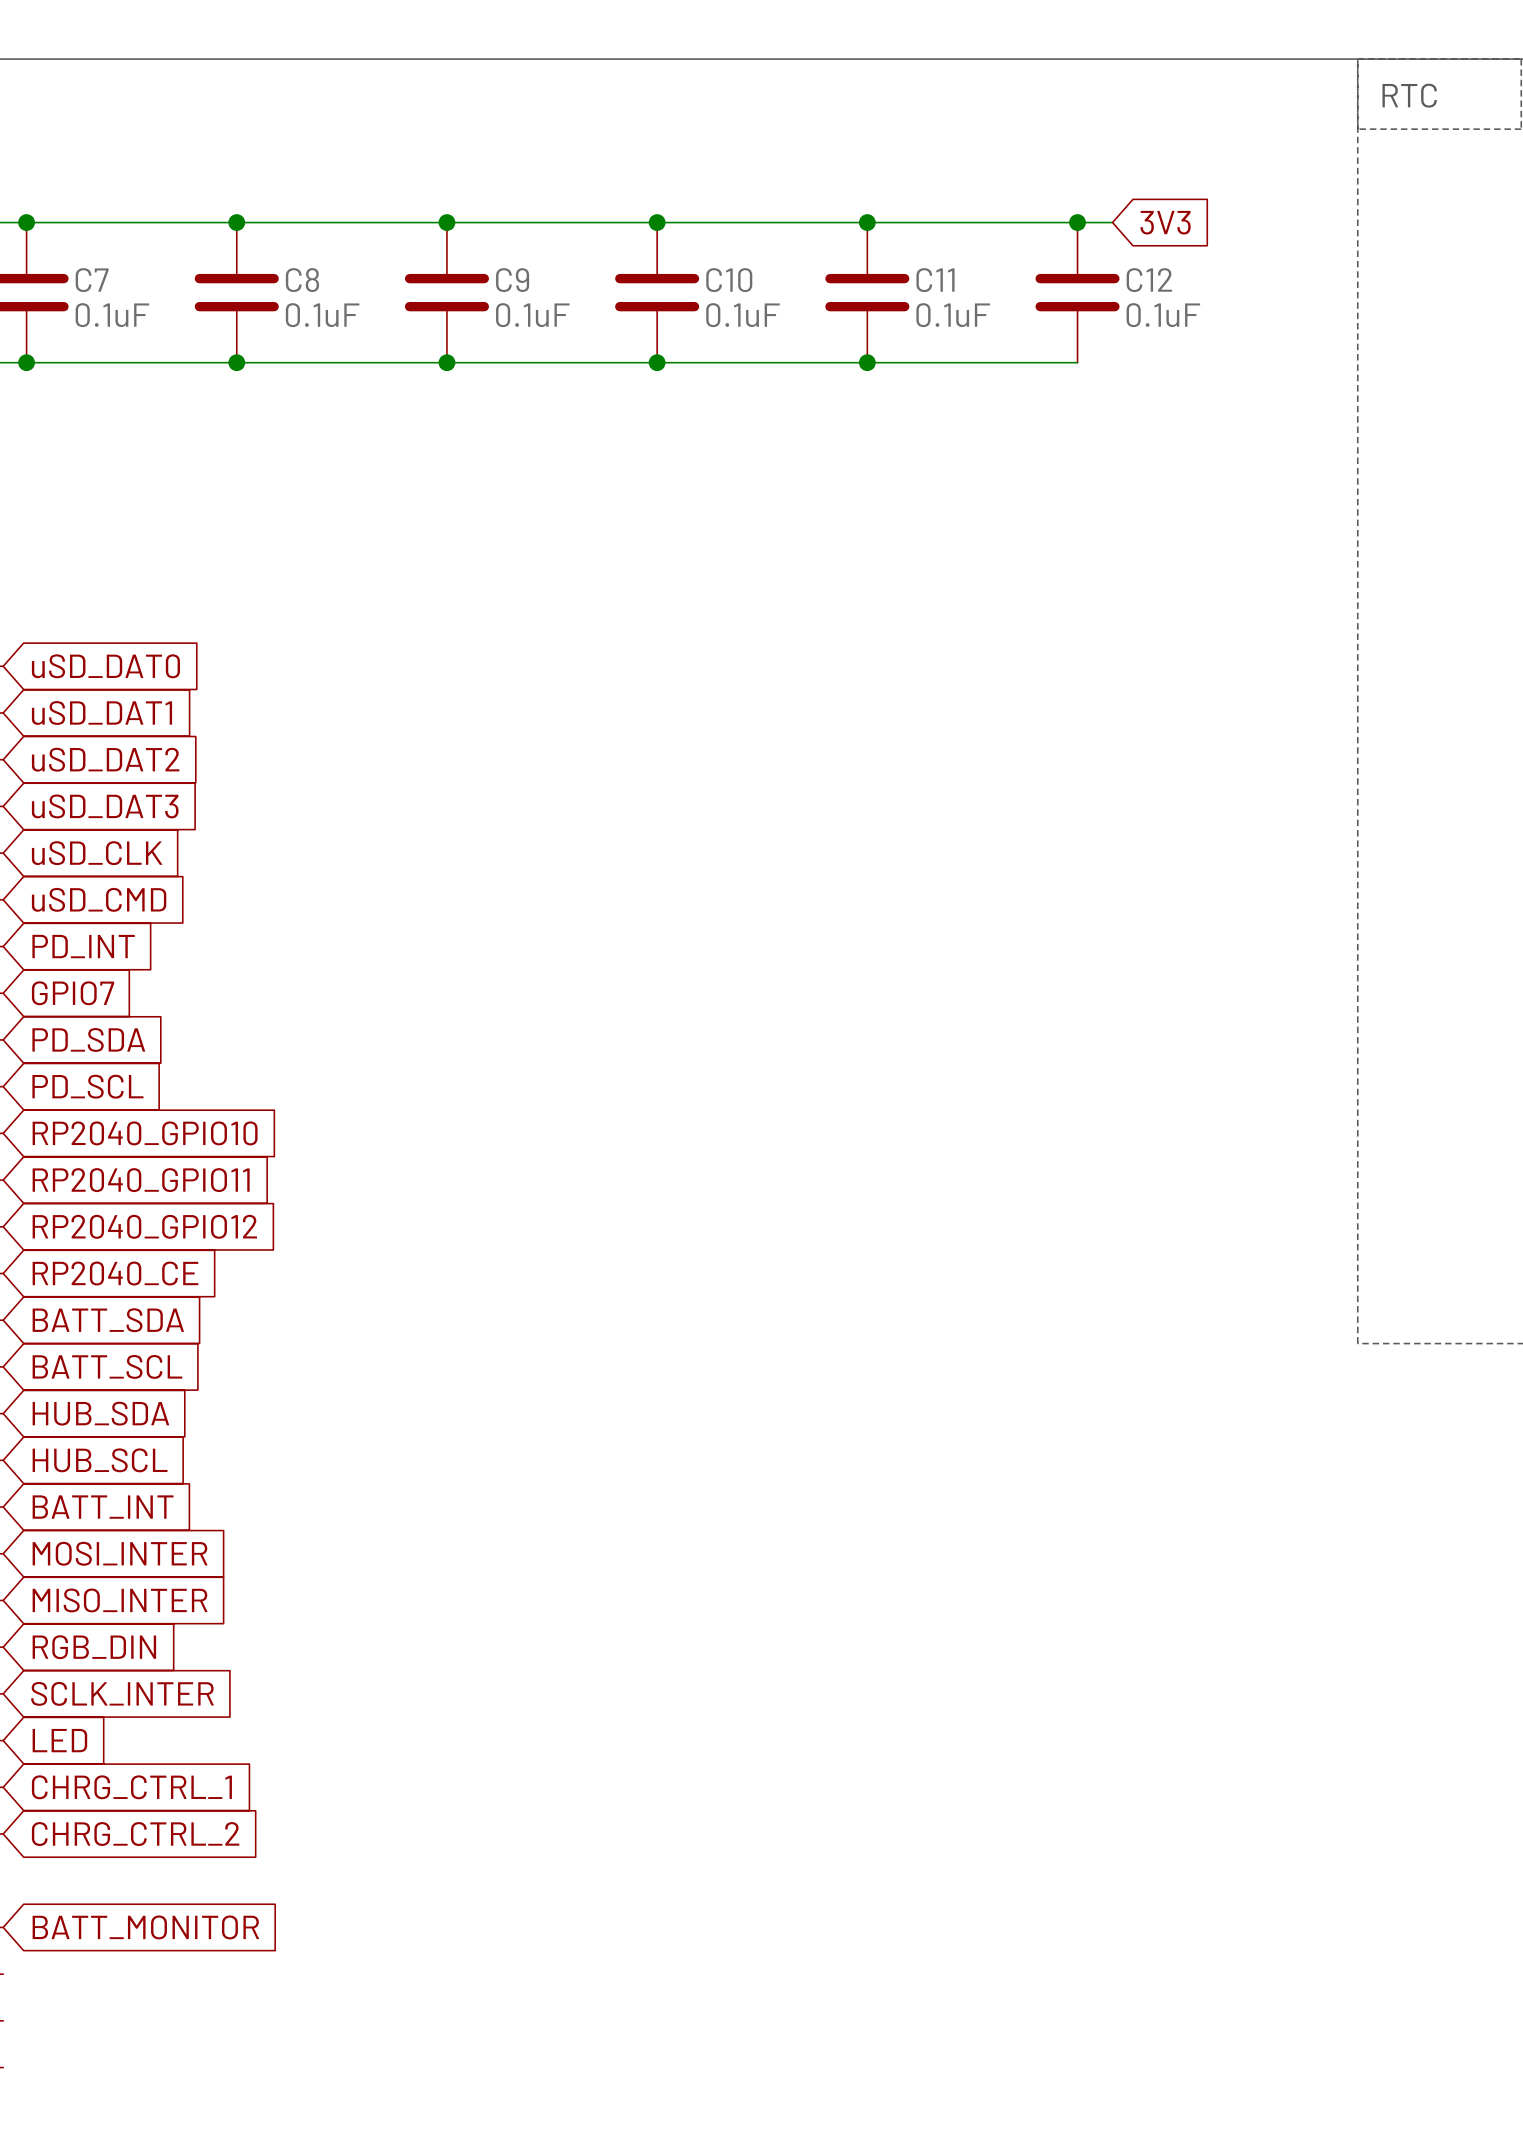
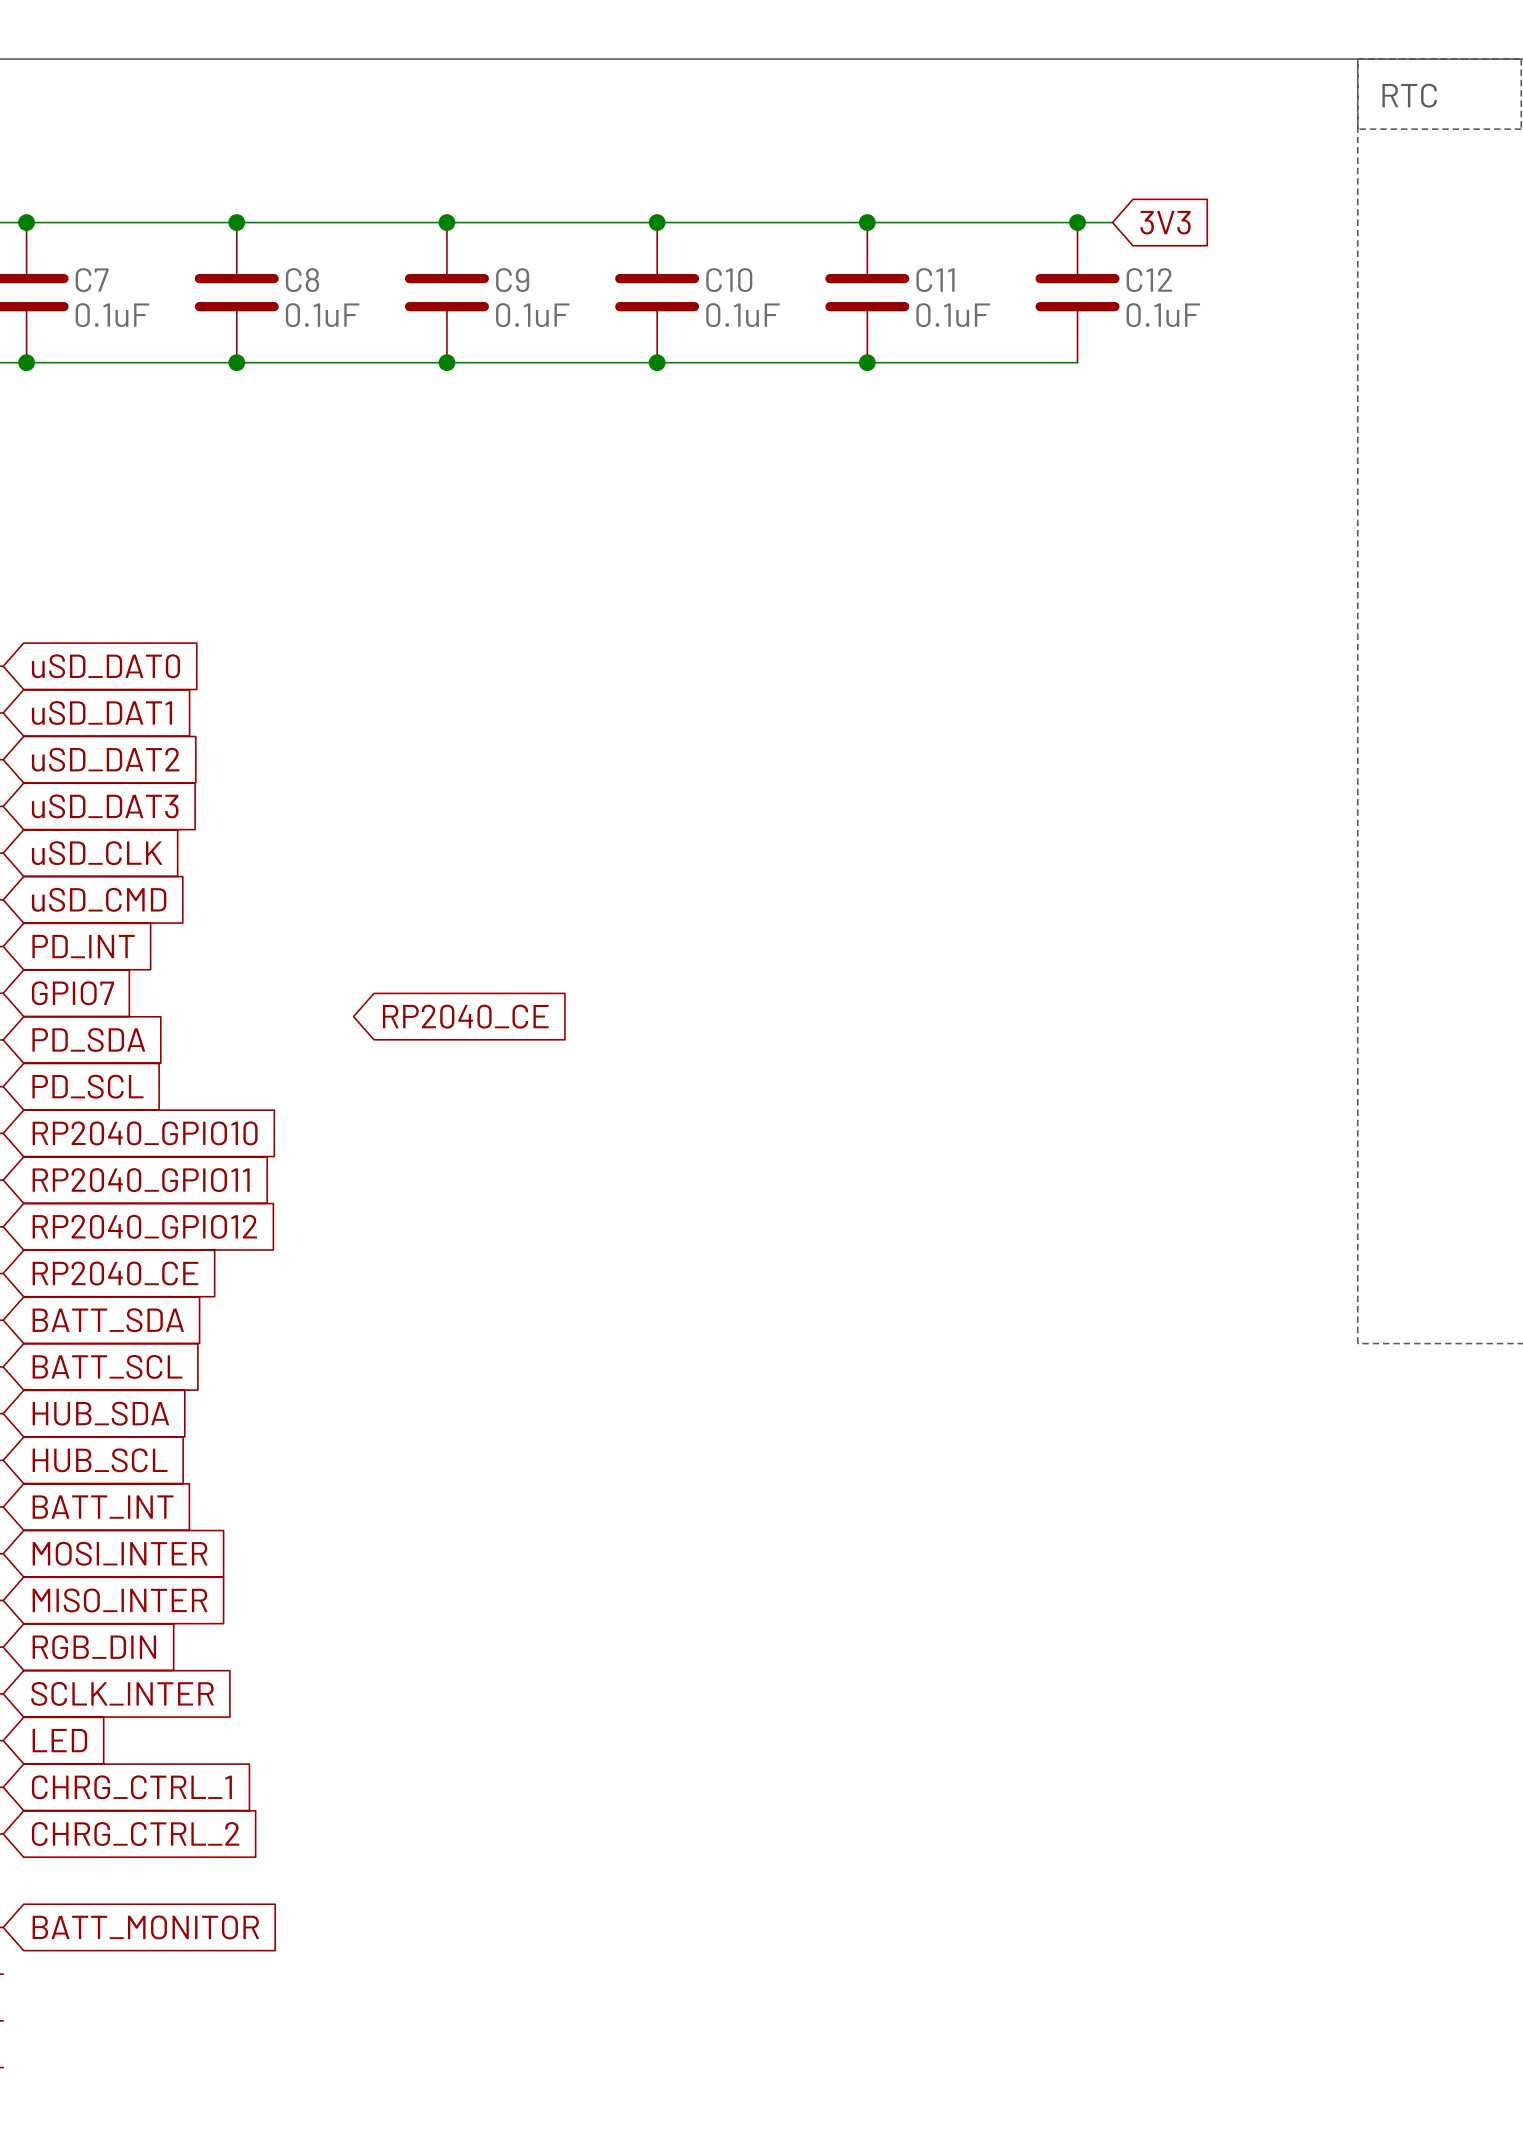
global label: none -> RP2040_CE (465, 1016)

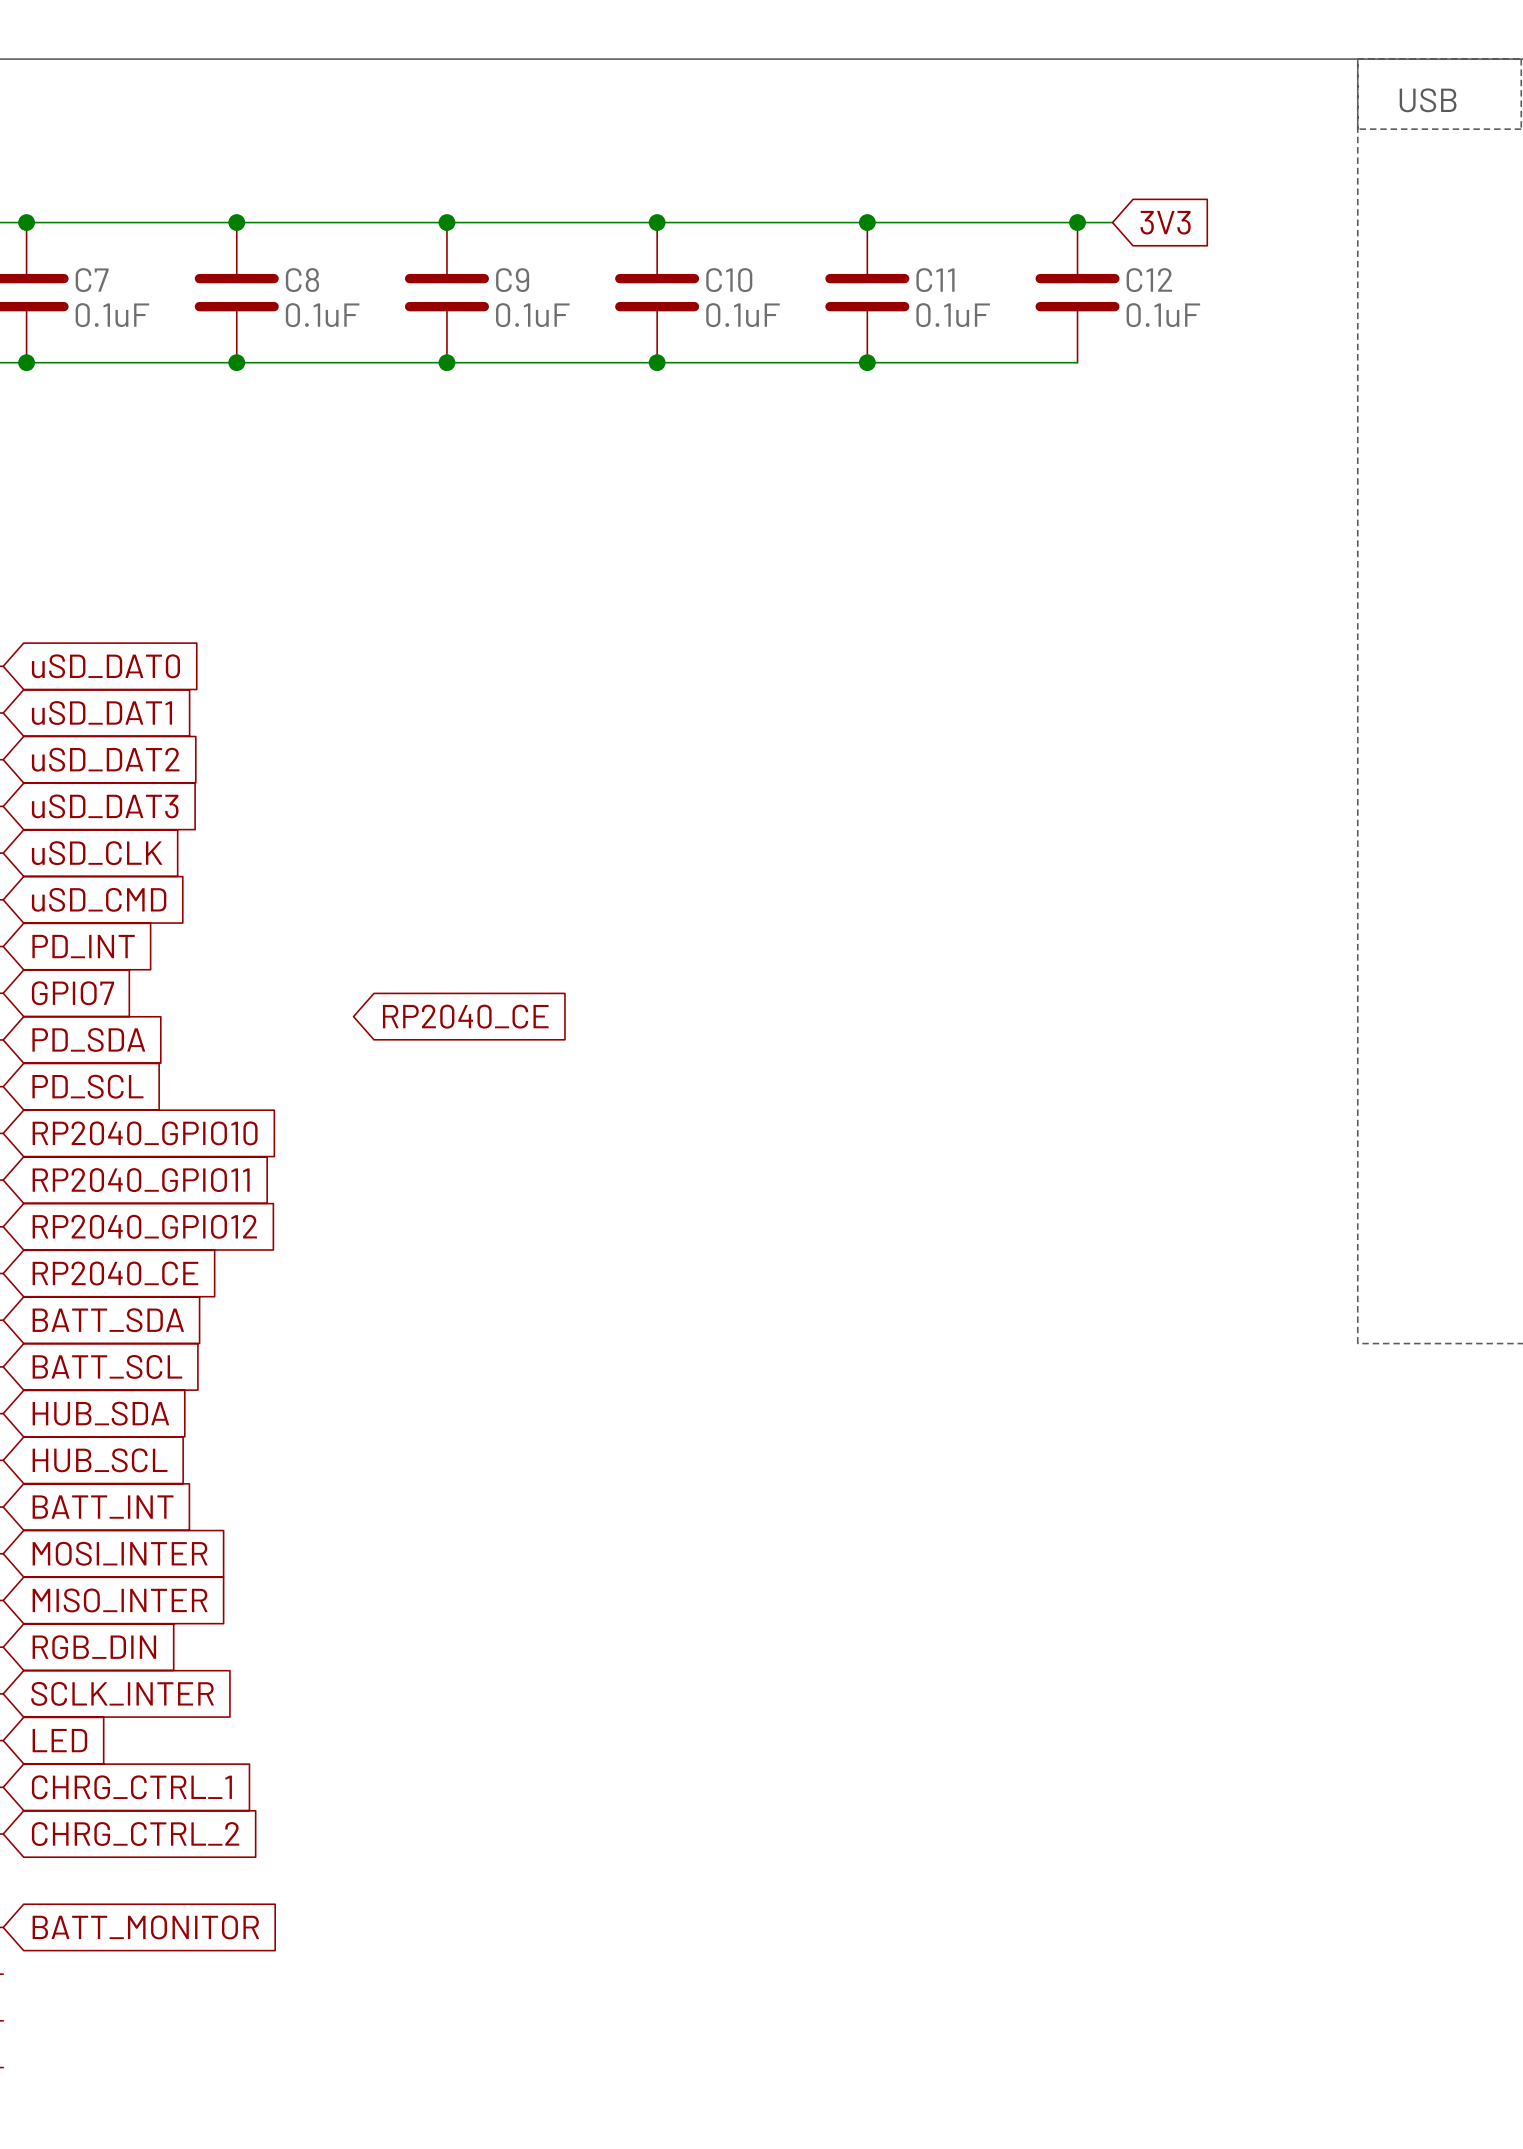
text: RTC (1409, 95) -> none
text: none -> USB (1428, 100)

